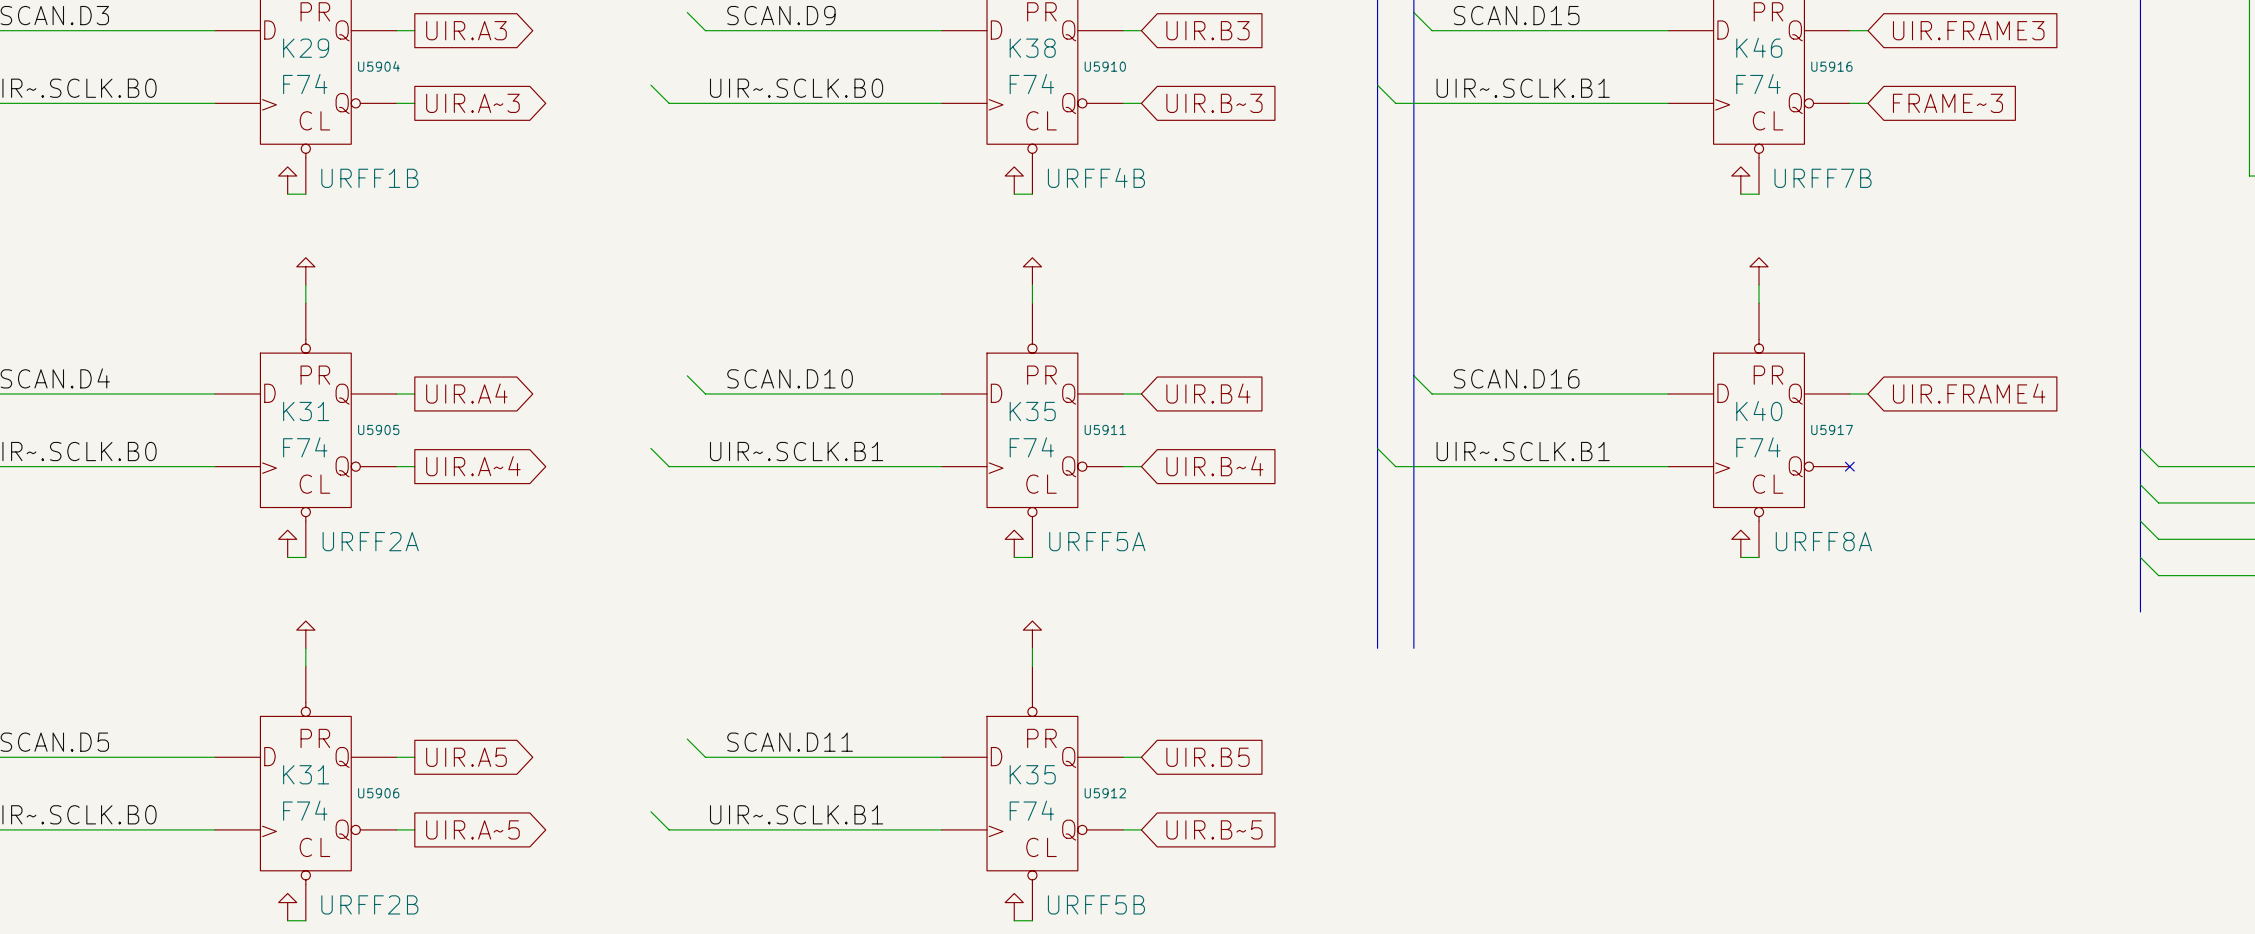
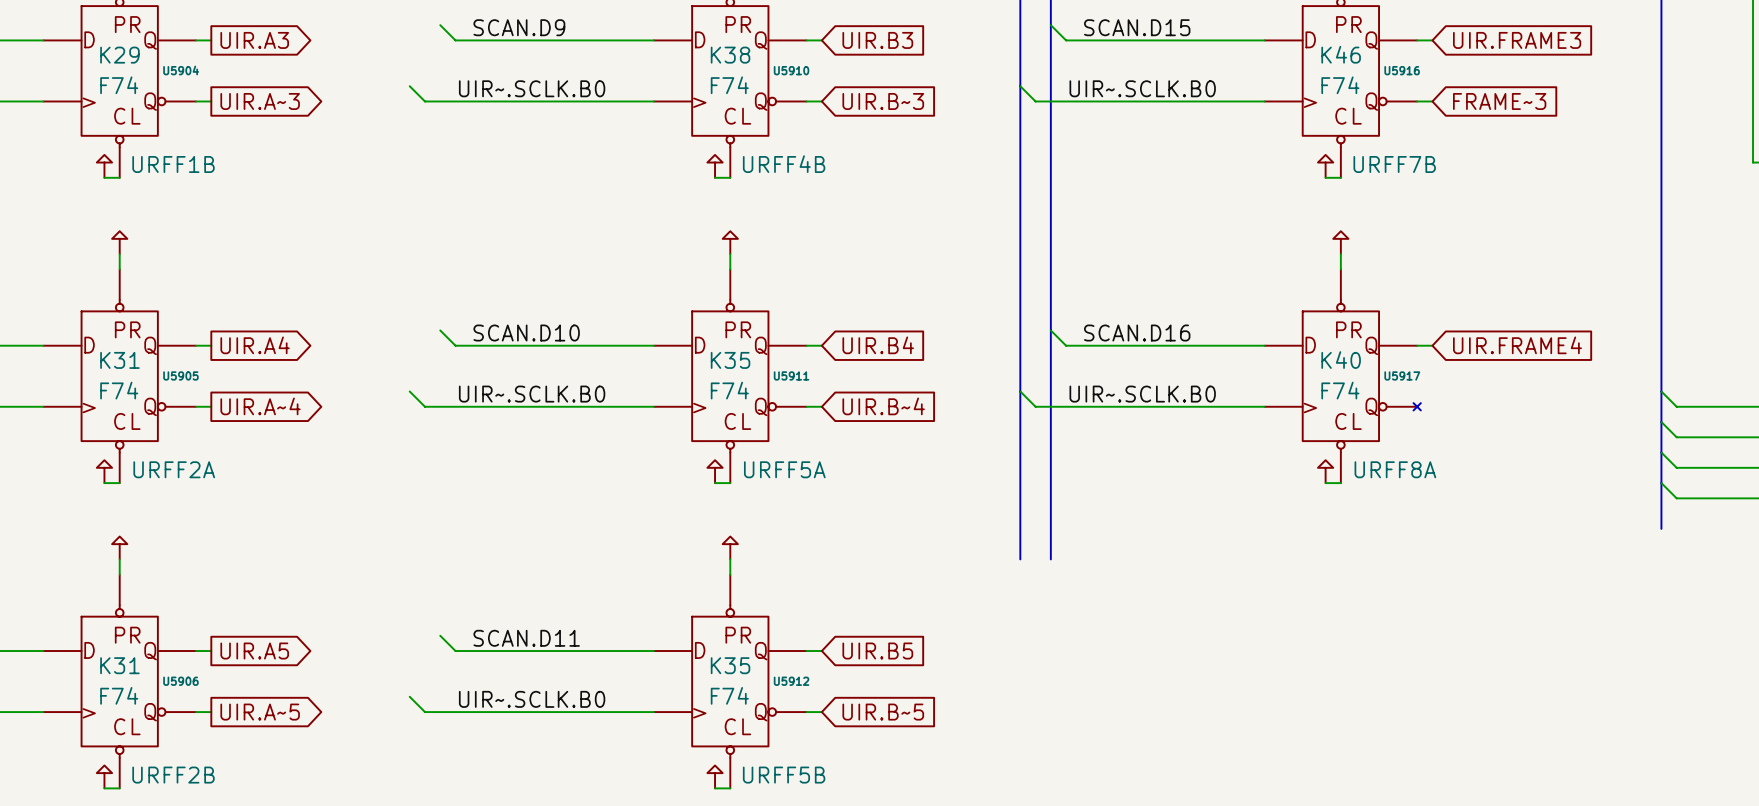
label: UIR~.SCLK.B1 (1523, 88) -> UIR~.SCLK.B0 (1142, 88)
label: UIR~.SCLK.B1 (796, 451) -> UIR~.SCLK.B0 (532, 394)
label: UIR~.SCLK.B1 (1523, 451) -> UIR~.SCLK.B0 (1142, 394)
label: UIR~.SCLK.B1 (796, 814) -> UIR~.SCLK.B0 (532, 699)

